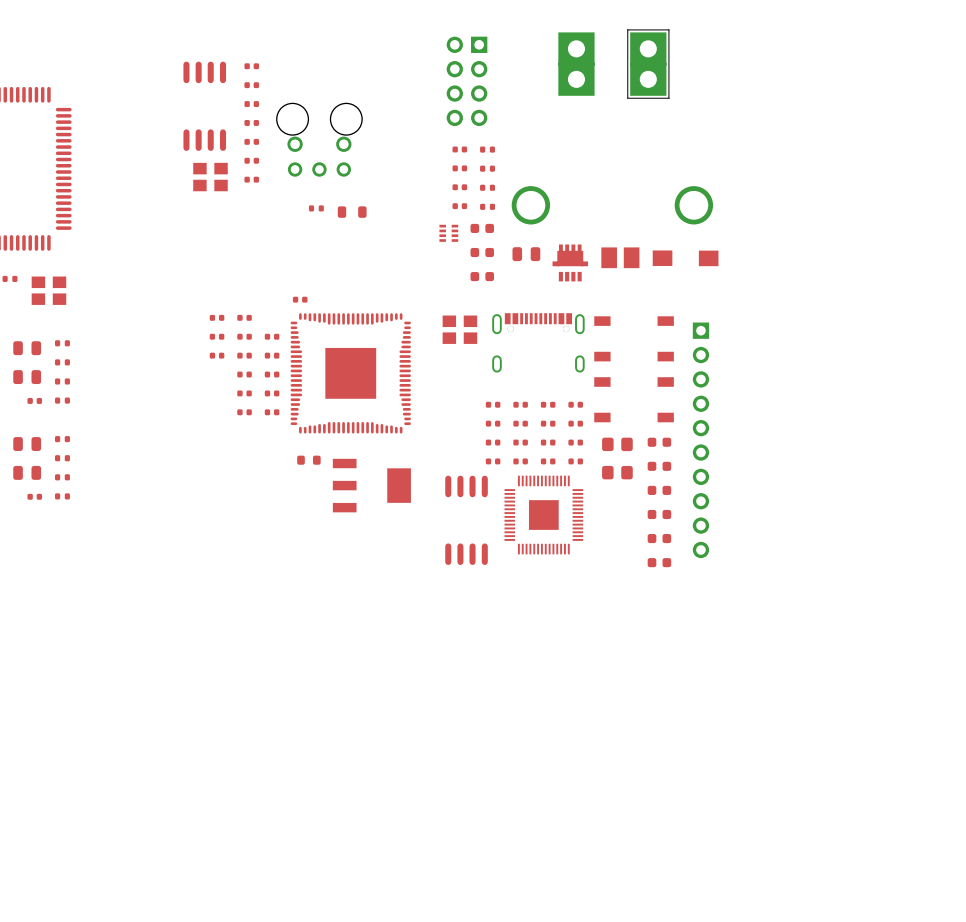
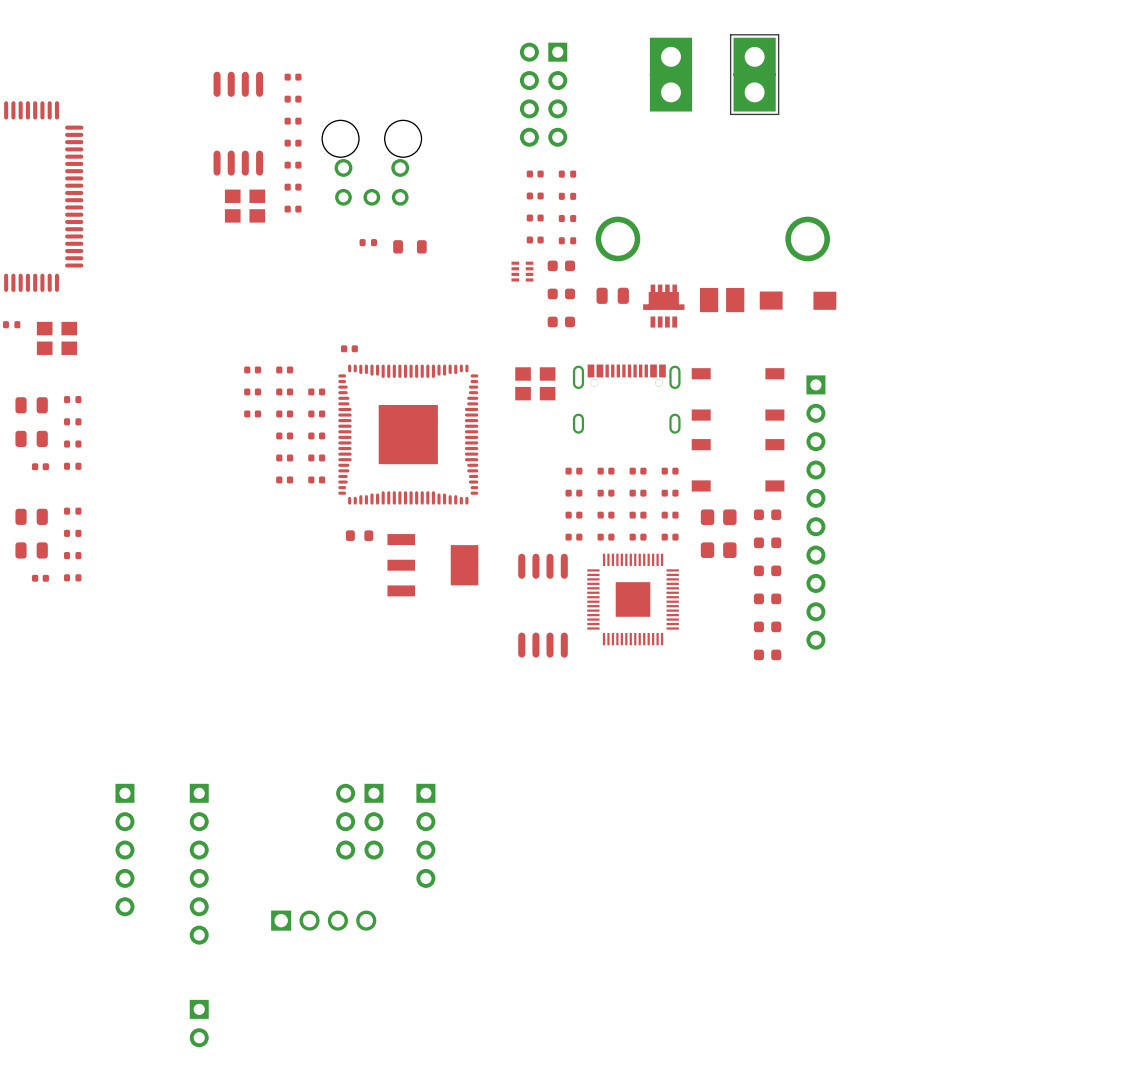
part: none -> (359, 821)
part: none -> (425, 835)
part: none -> (124, 850)
part: none -> (199, 864)
part: none -> (323, 920)
part: none -> (199, 1023)

